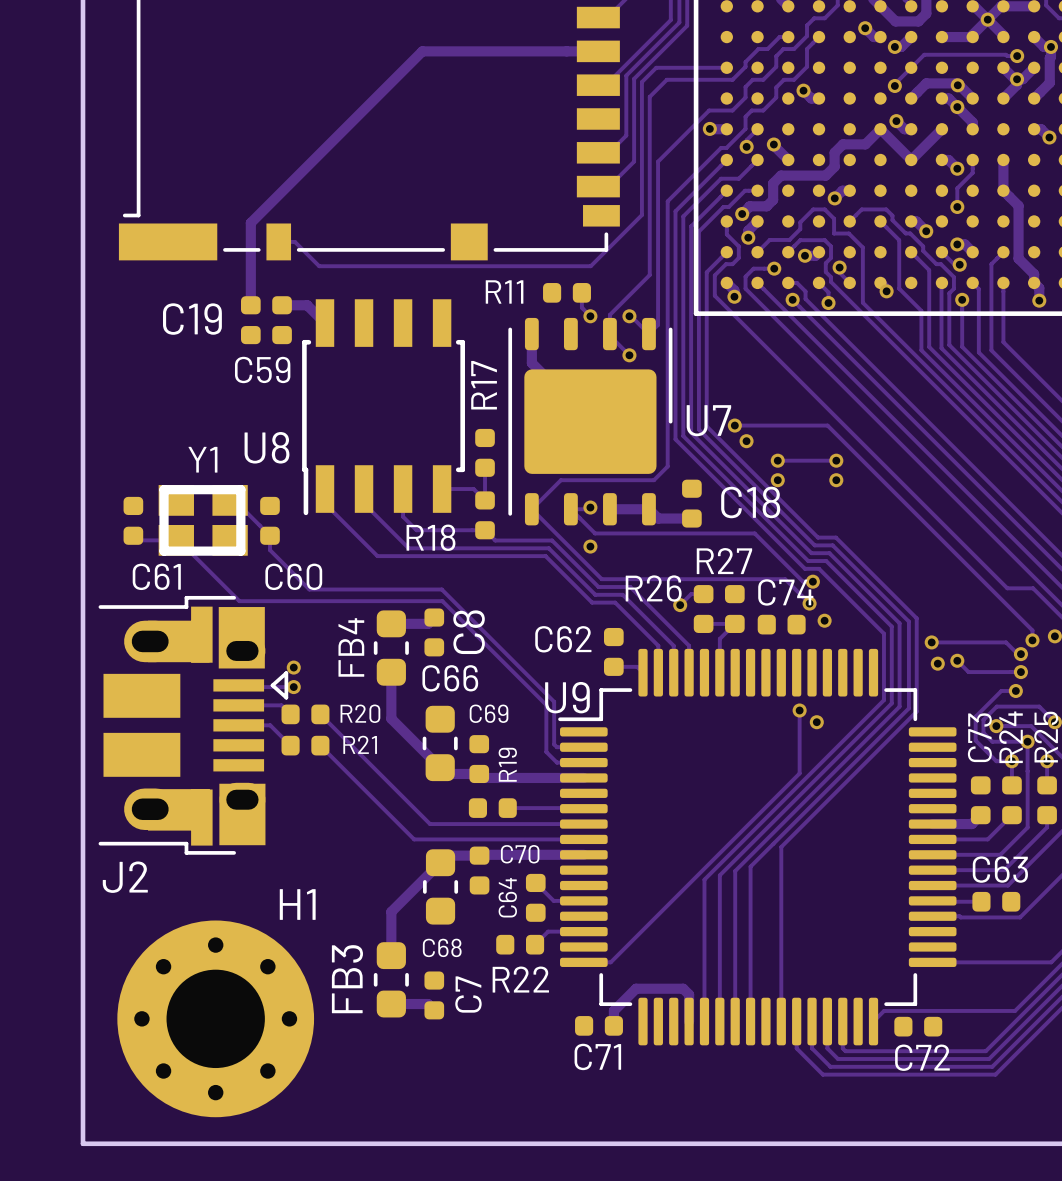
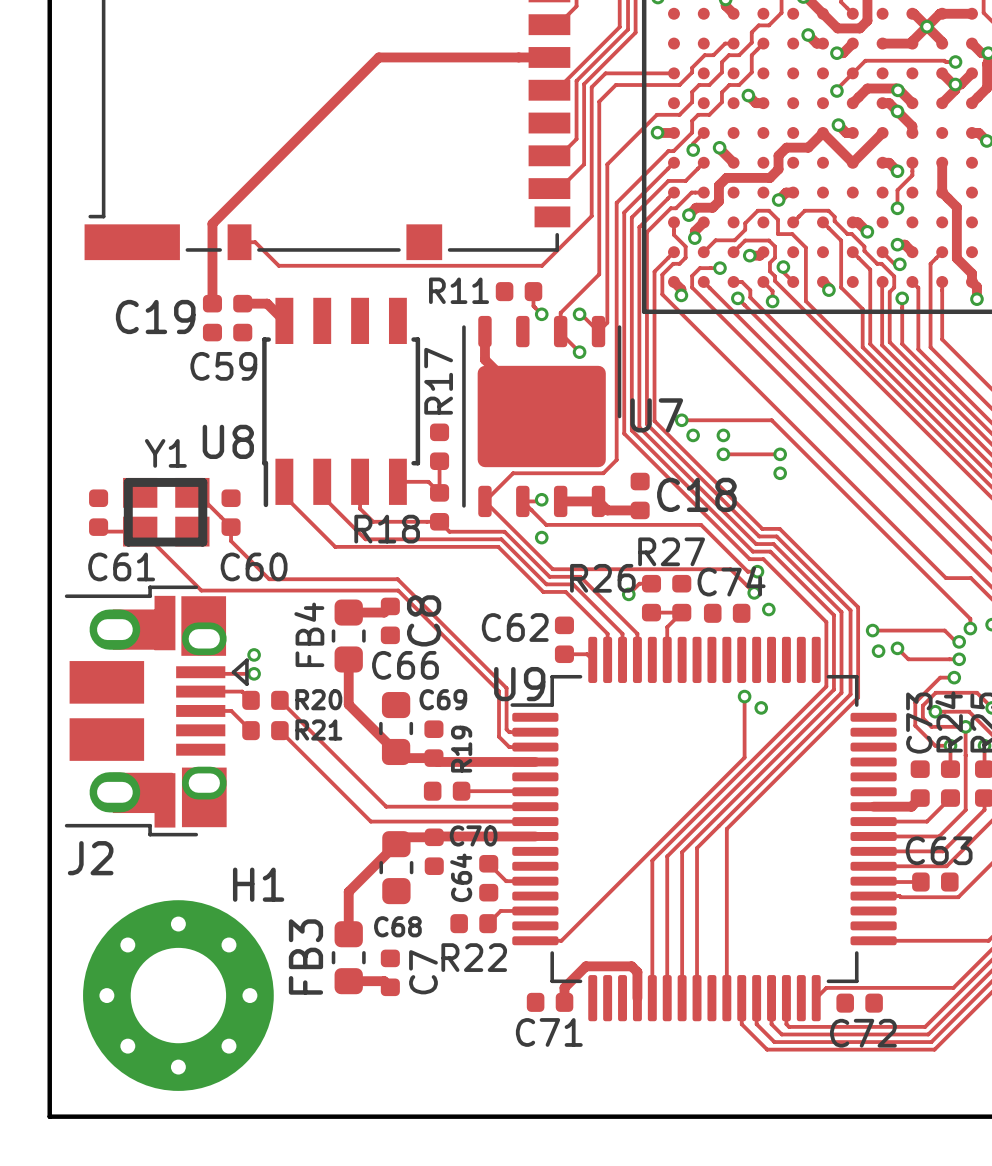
via position: (777, 480) -> (723, 435)

